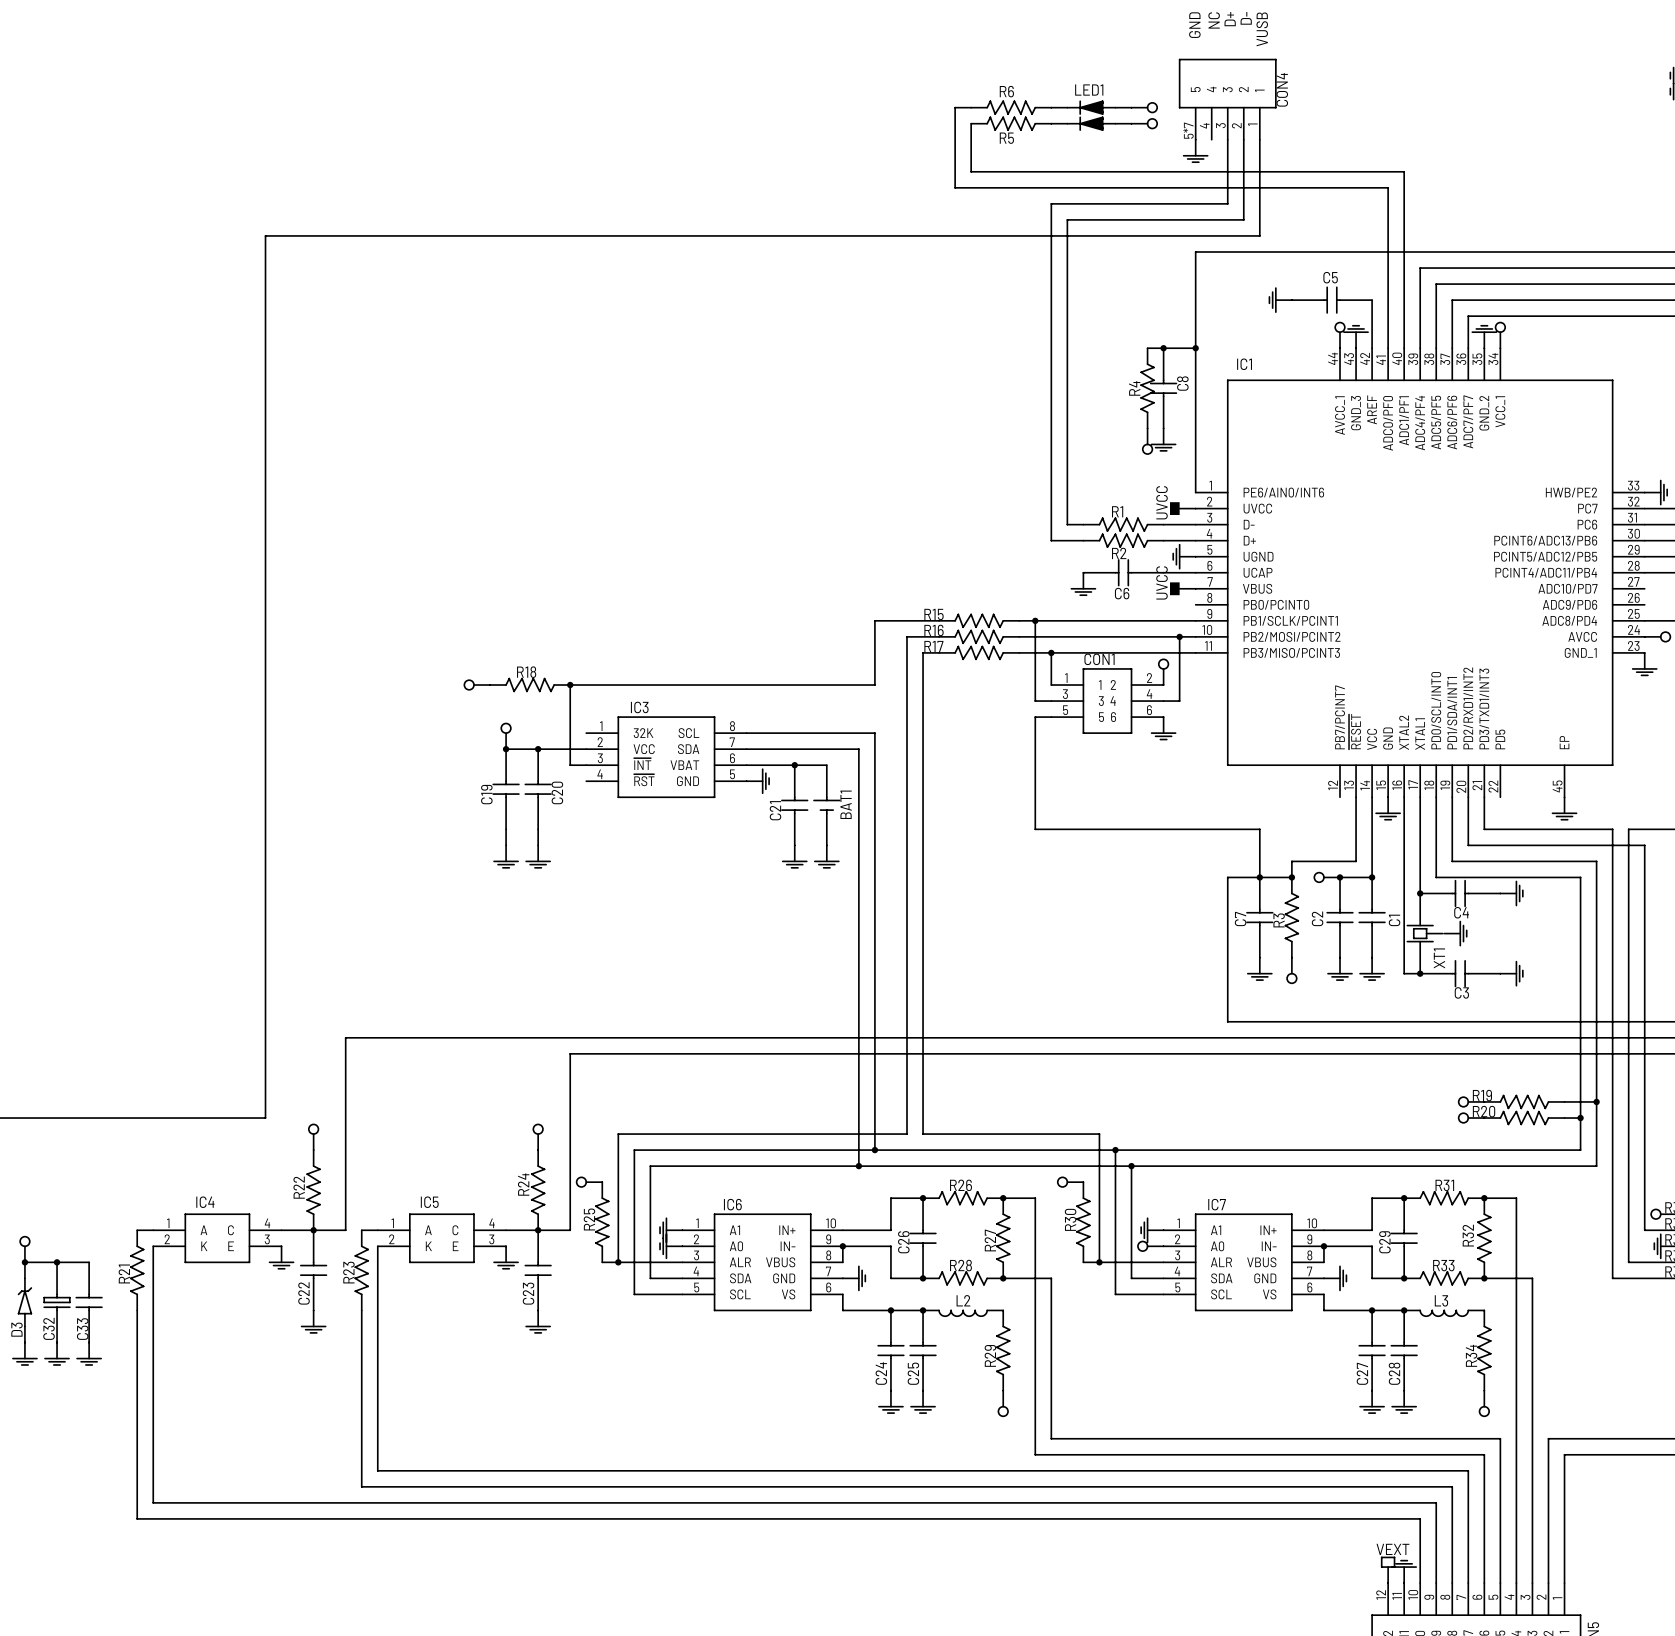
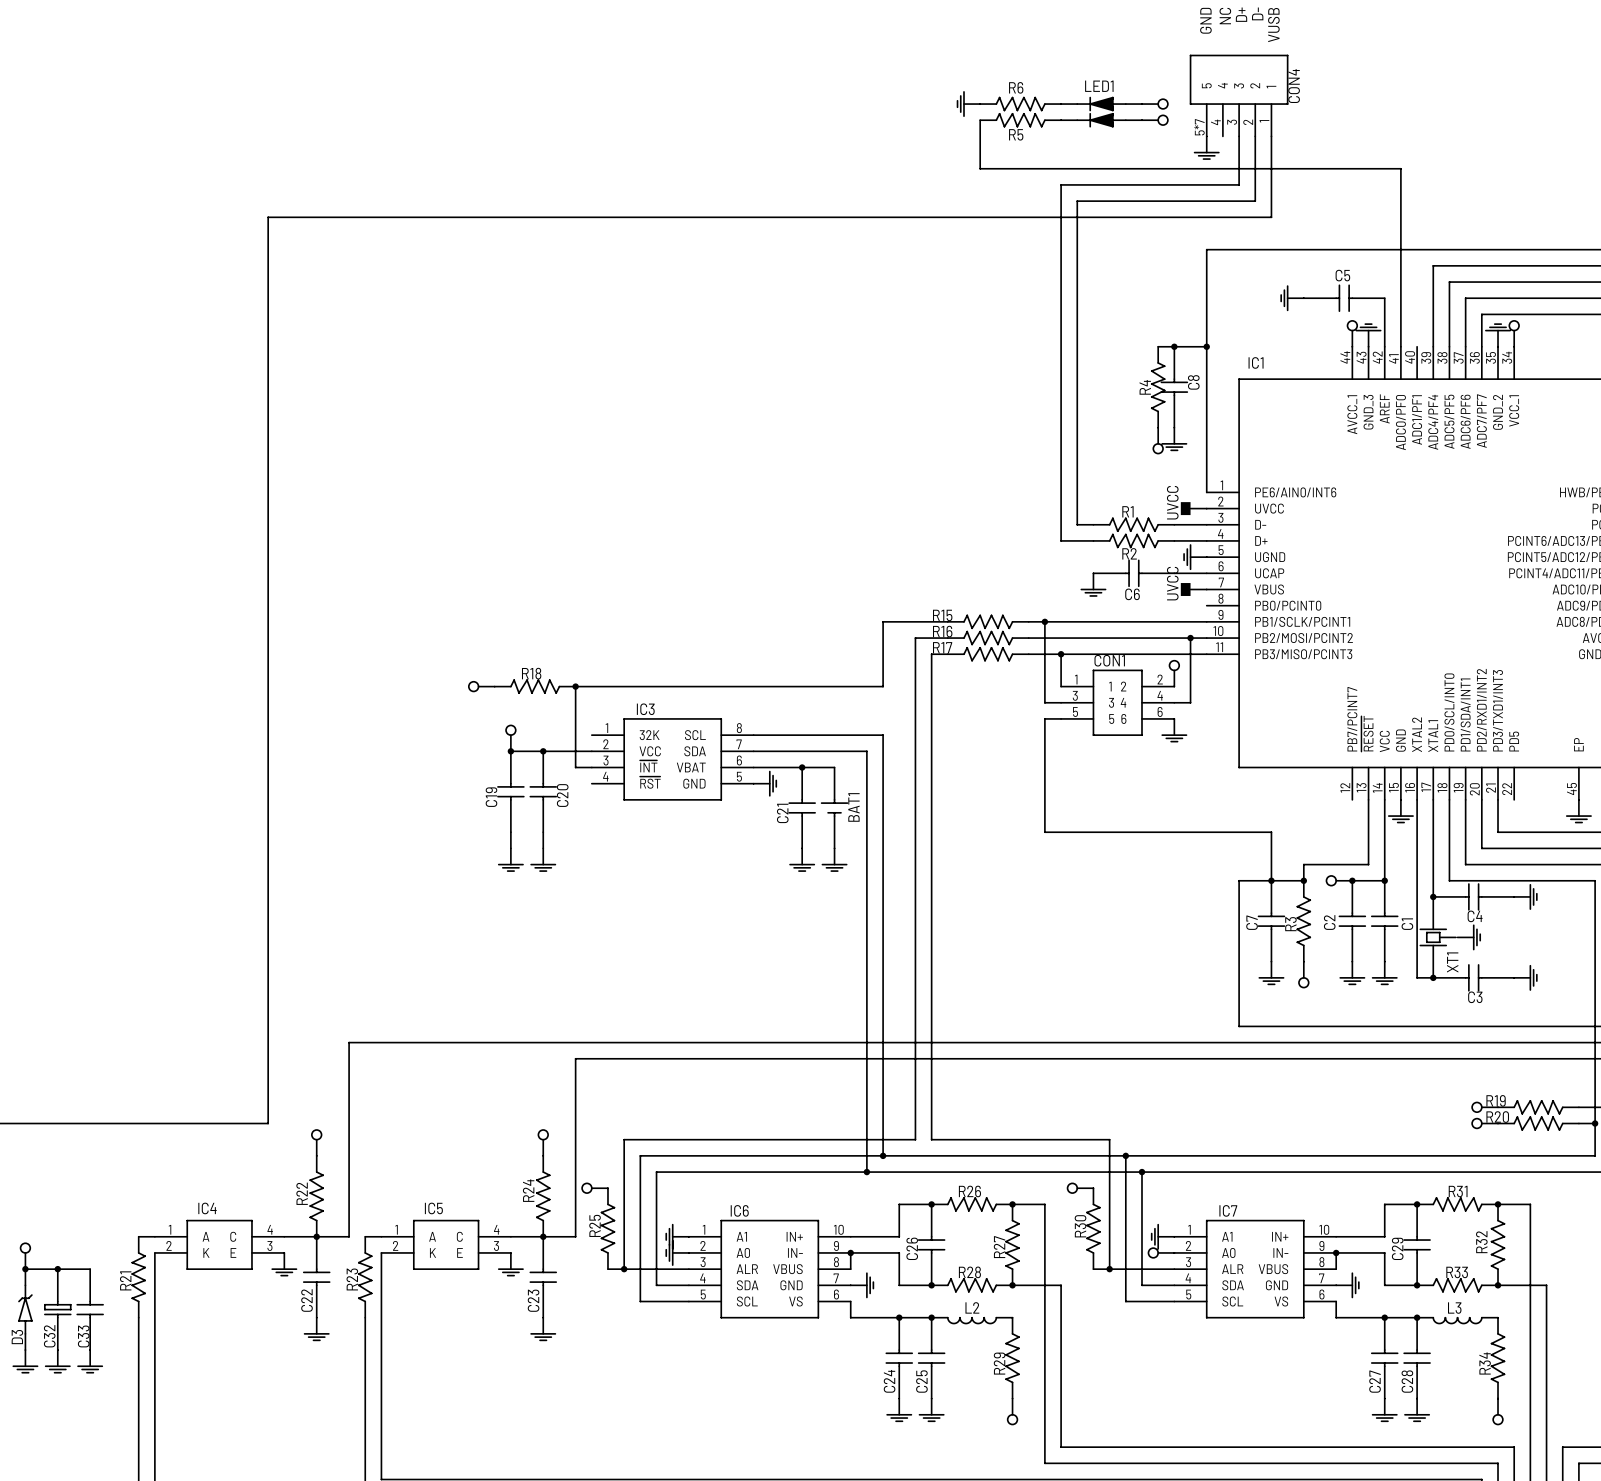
power symbol: none -> (968, 104)
wire: (971, 107) (955, 107) (955, 187) (1051, 187) -> none
wire: (1388, 171) (1404, 171) (1404, 348) -> (1400, 168) (1400, 184)
wire: (1388, 187) (1227, 187) (1227, 203) -> none
wire: (1051, 203) (1067, 203) -> (1061, 201) (1061, 184)
wire: (1243, 203) (1243, 219) -> (1255, 201) (1239, 201)
wire: none -> (1255, 217) (1271, 217)
wire: (1259, 219) (1259, 235) (265, 235) -> (1077, 201) (1077, 217) (268, 217) (268, 233)

